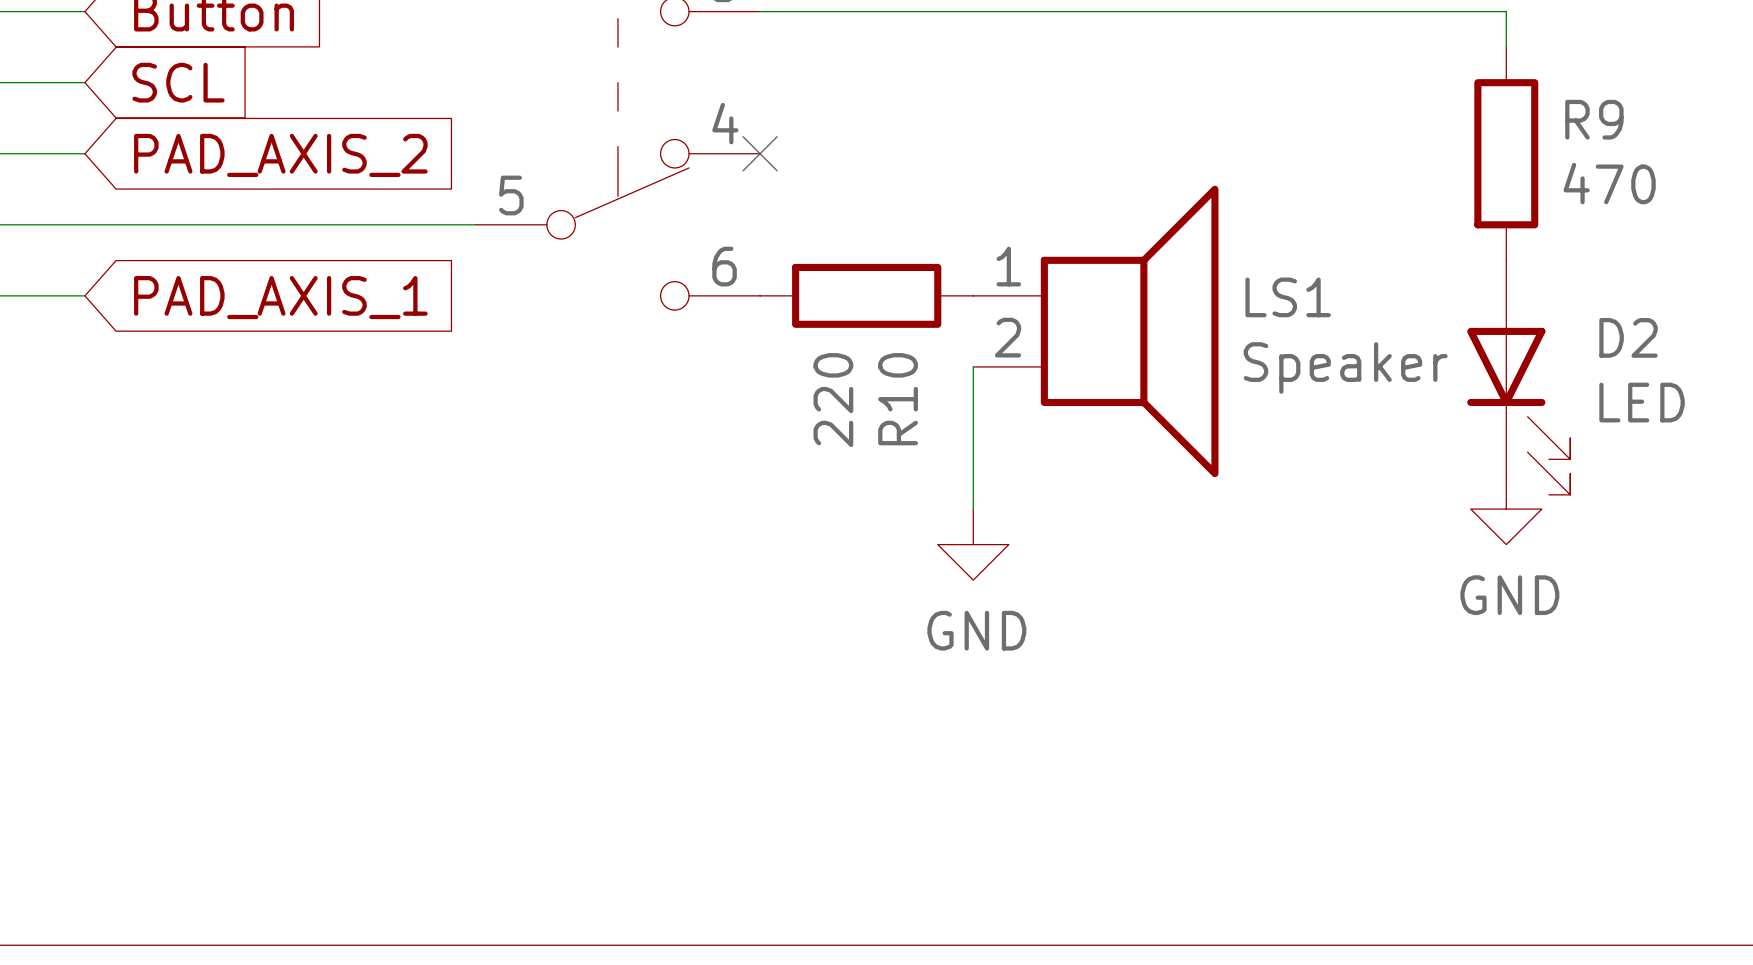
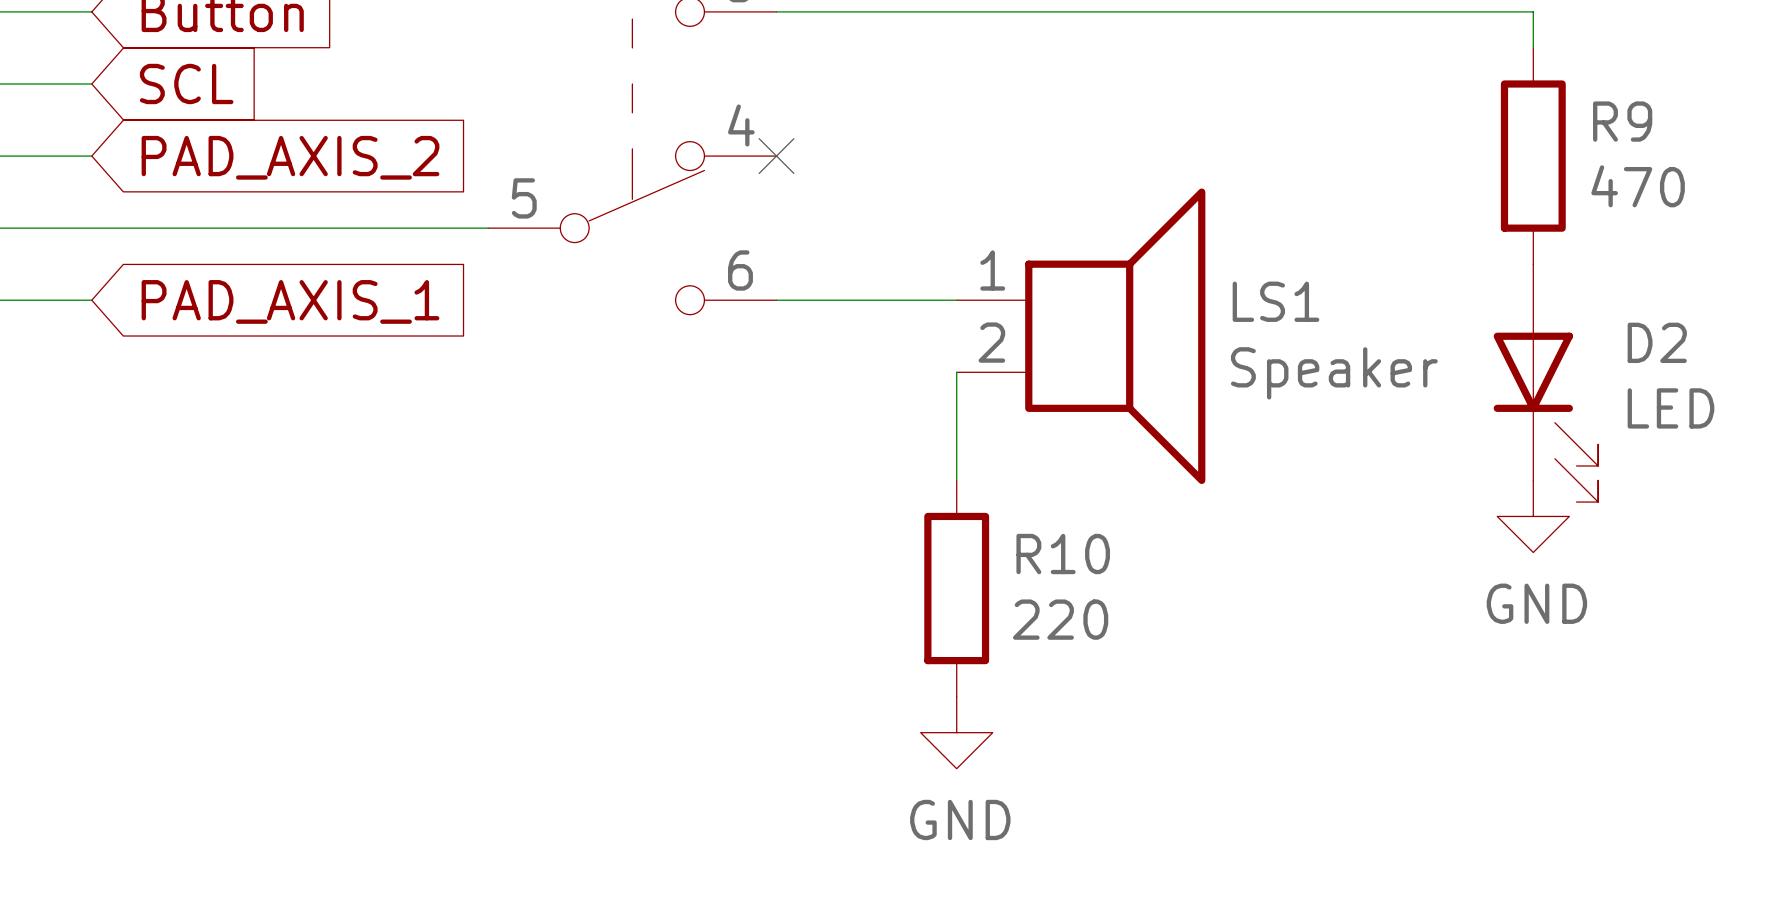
wire: none -> (776, 300) (956, 300)
R10 rotation: 0° (866, 295) -> 90° clockwise (956, 588)
R10 position: (866, 295) -> (956, 588)
LS1 position: (1095, 331) -> (1081, 336)
wire: none -> (956, 372) (956, 480)
wire: (973, 366) (973, 509) -> none
R10 name position: R10 (898, 399) -> R10 (1063, 554)
R10 value position: 220 (833, 400) -> 220 (1060, 619)
power symbol position: GND (973, 544) -> GND (956, 732)

